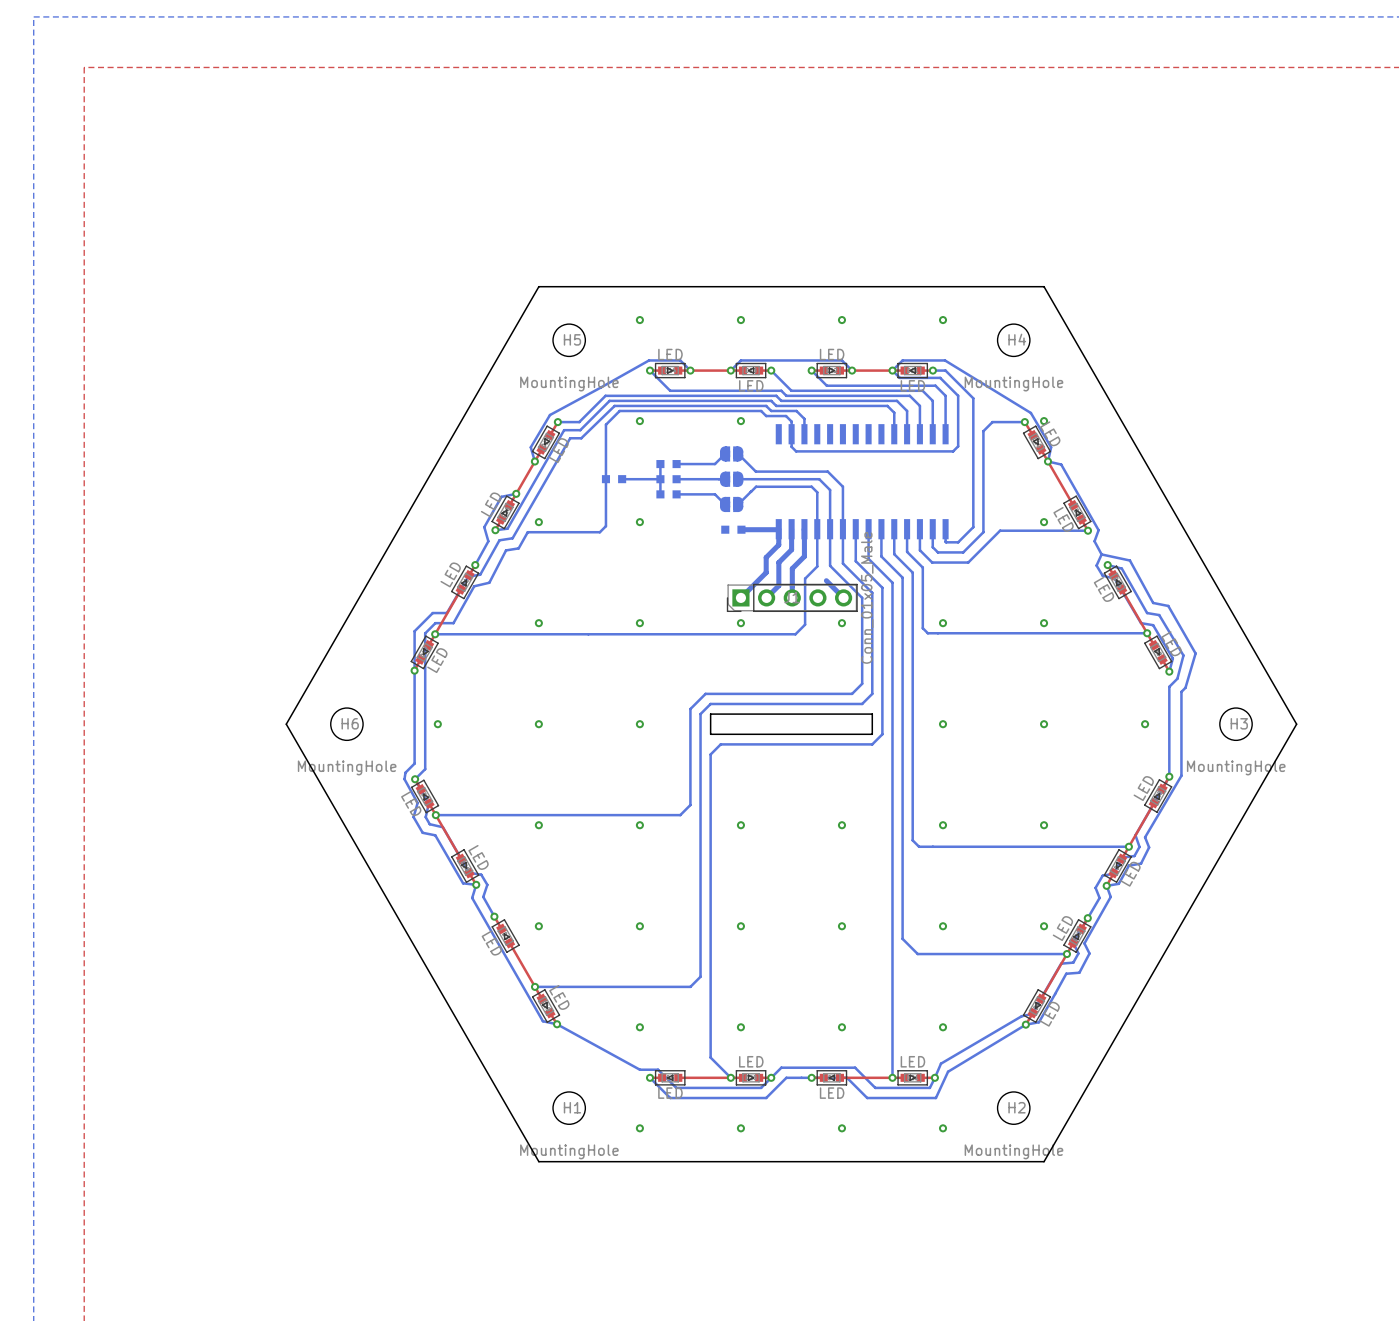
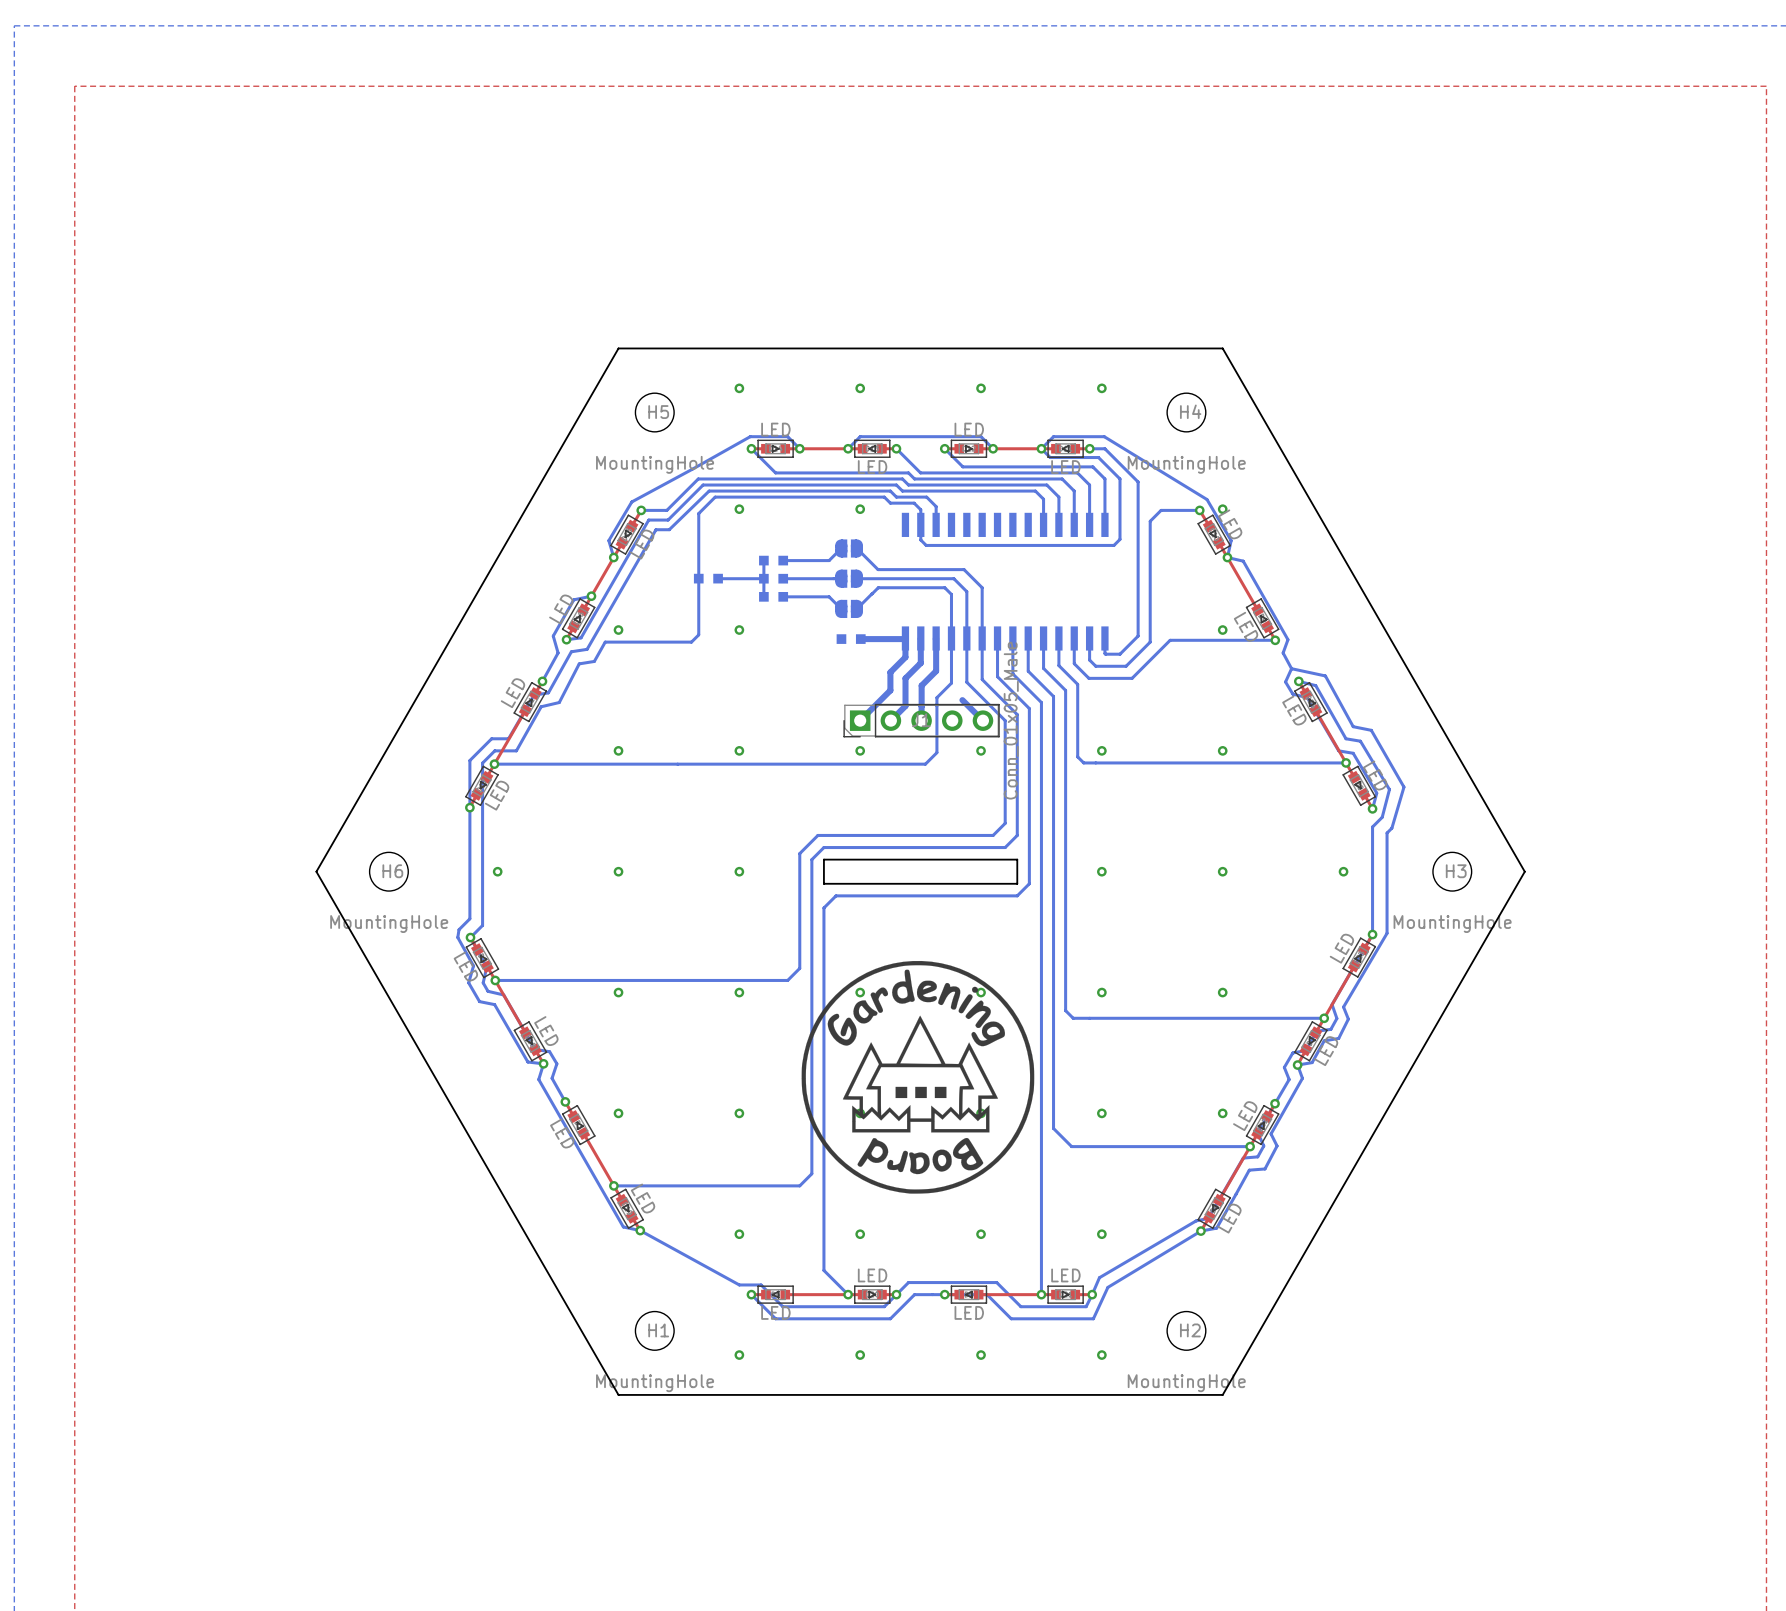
drawing: none -> [801, 960, 1035, 1194]

